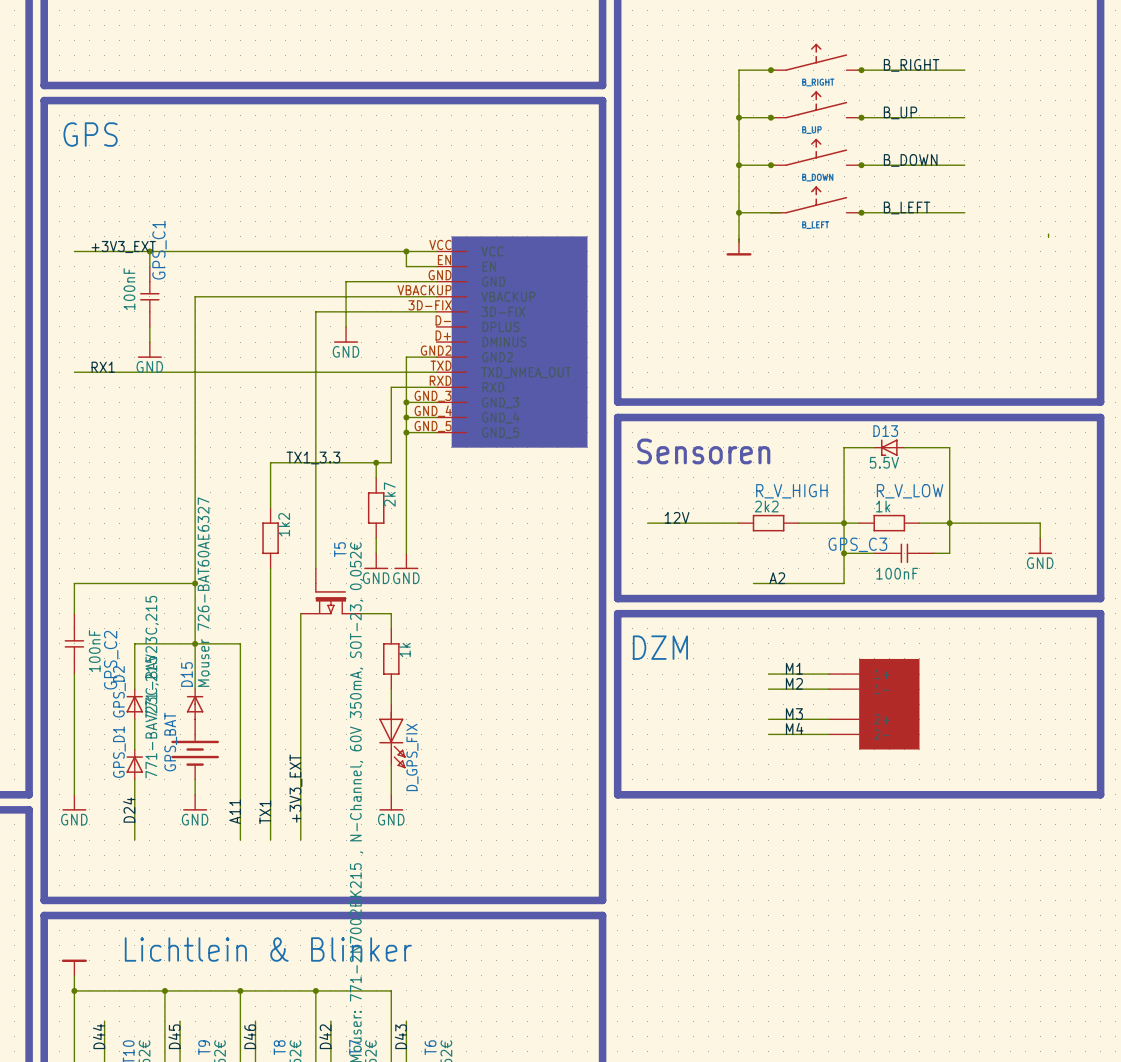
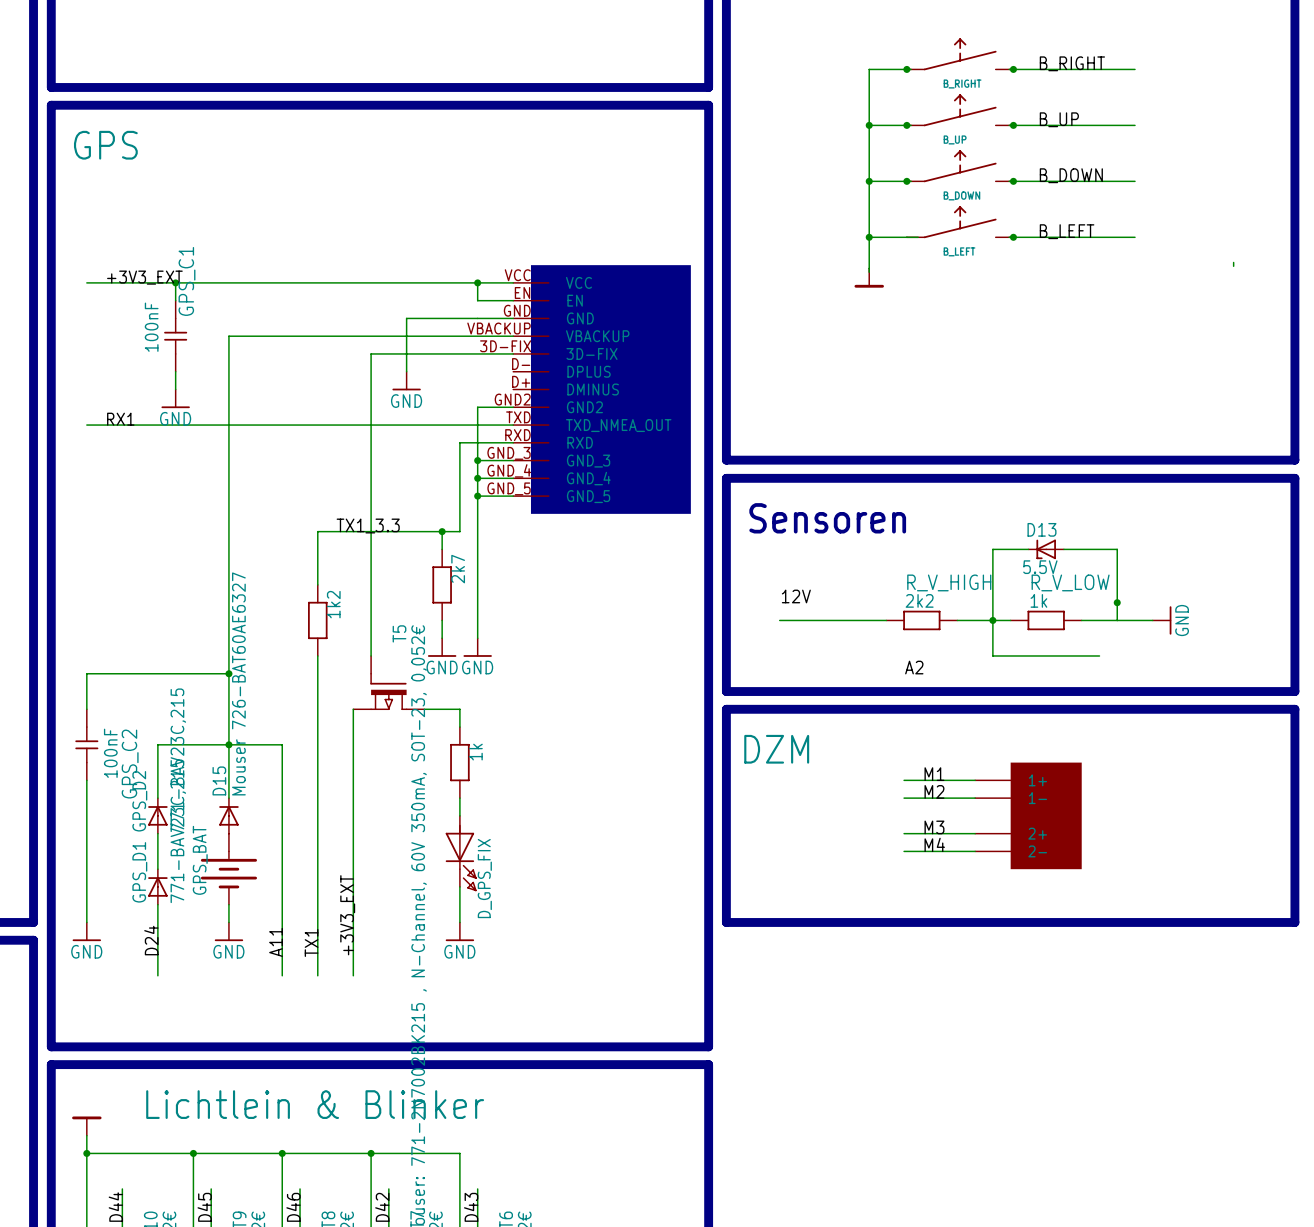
wire: (874, 447) (844, 447) (844, 477) -> (1028, 549) (992, 549)
D13 position: (889, 447) -> (1046, 549)
wire: (904, 447) (949, 447) (949, 477) -> (1063, 549) (1117, 549)
wire: (647, 523) (738, 523) -> (779, 620) (886, 620)
R_V_HIGH position: (768, 523) -> (921, 620)
wire: (798, 523) (859, 523) -> (1081, 620) (1152, 620)
junction: (844, 523) -> none
R_V_LOW position: (889, 523) -> (1046, 620)
wire: (919, 523) (1040, 523) (1040, 538) -> none
wire: none -> (957, 620) (1010, 620)
junction: none -> (992, 620)
wire: (949, 538) (949, 553) (934, 553) -> none
power symbol position: GND (1040, 546) -> GND (1162, 620)
wire: (844, 553) (874, 553) -> none
junction: (844, 553) -> none
GPS_C3: 100nF (904, 553) -> none
power symbol rotation: 0° (1040, 553) -> 90° counterclockwise (1170, 620)
wire: (844, 568) (844, 583) (753, 583) -> (992, 655) (1099, 655)

